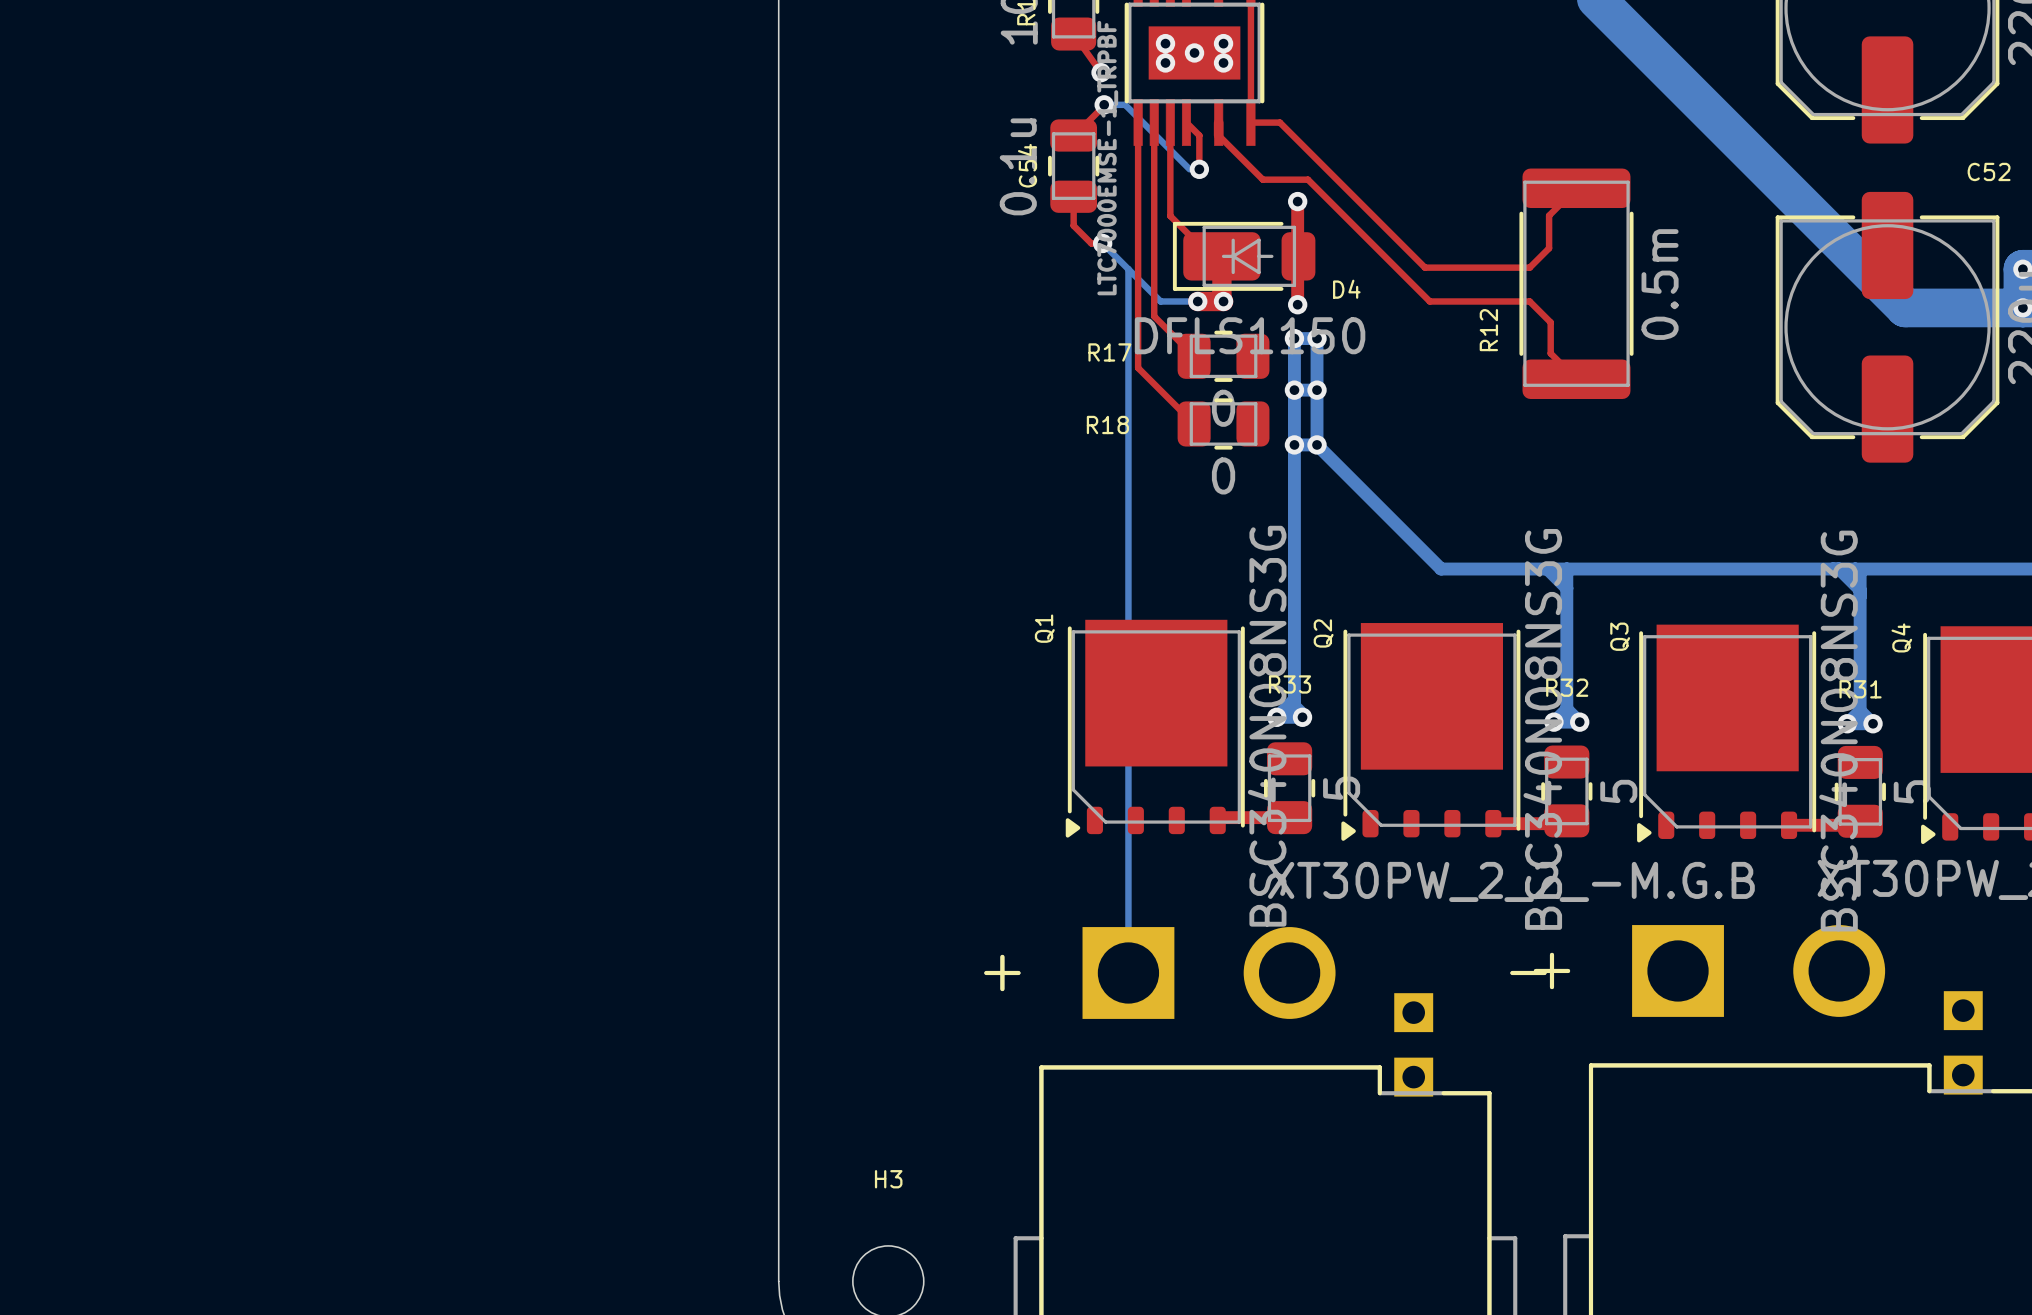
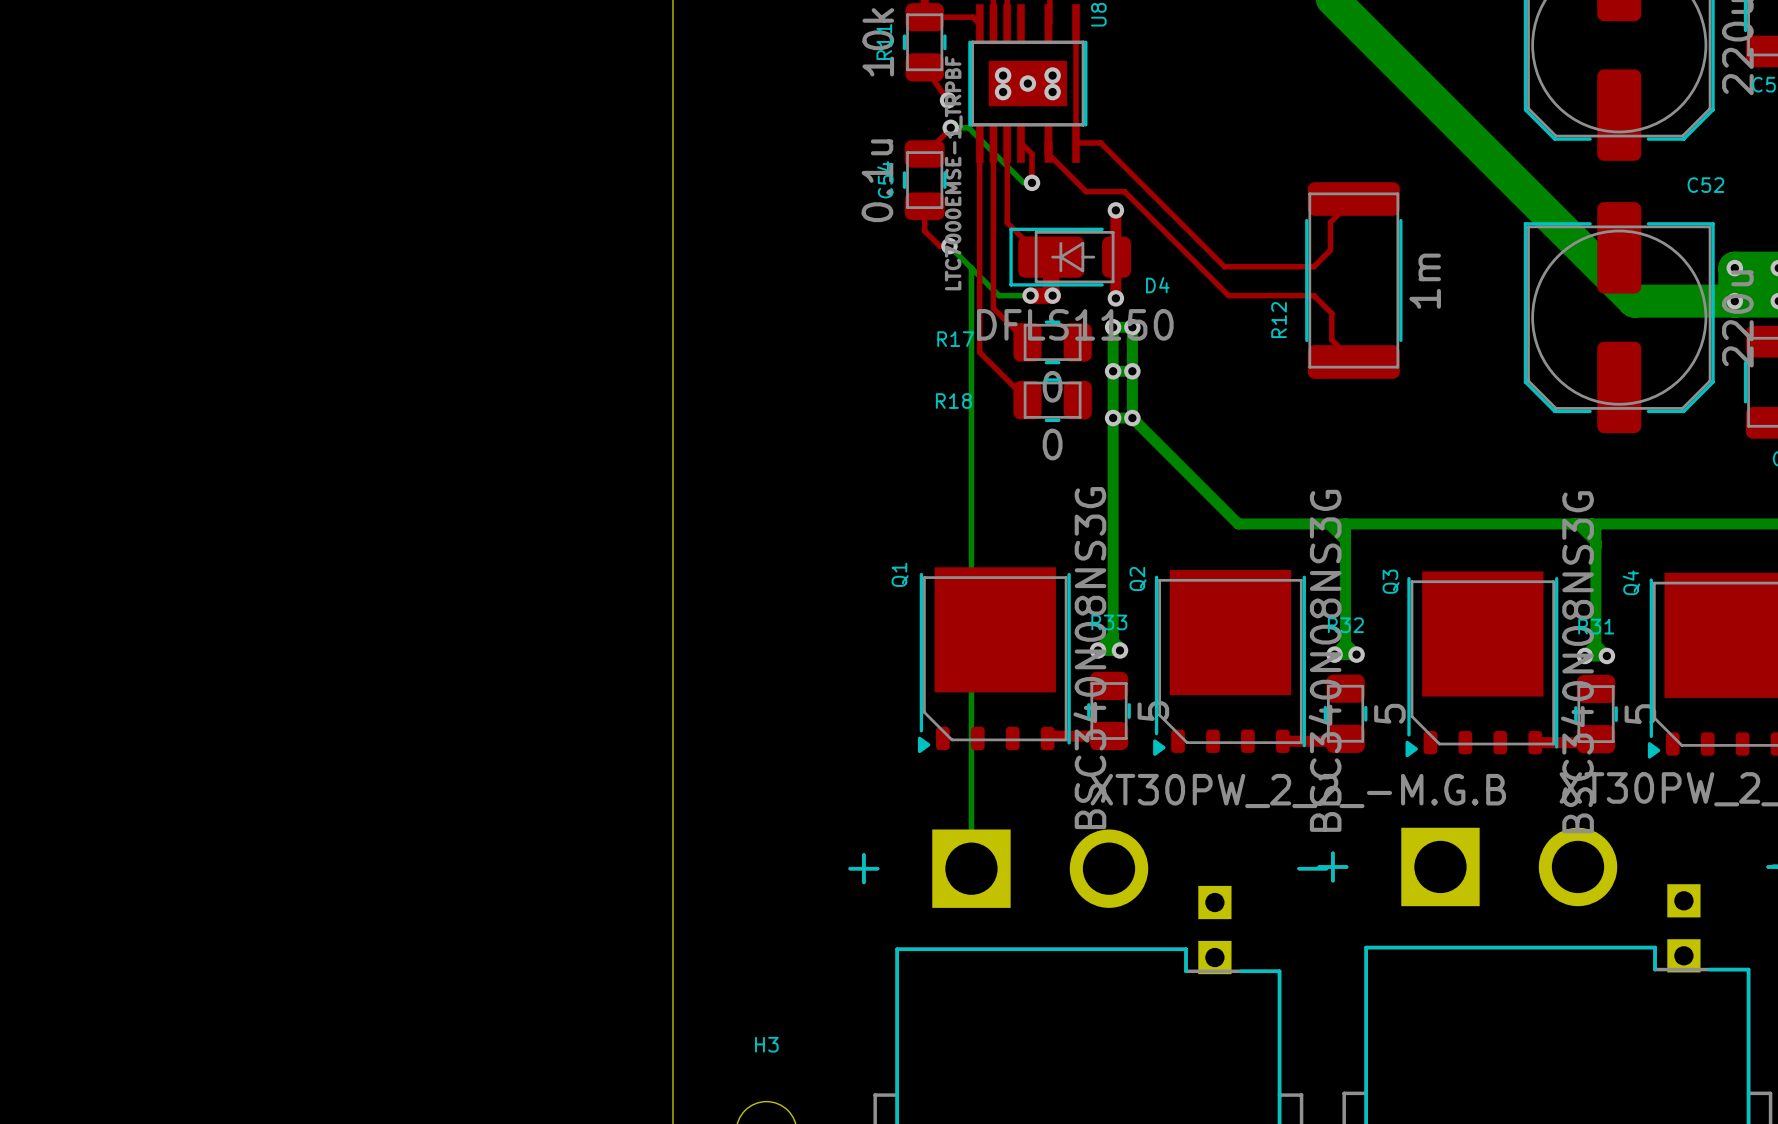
R12 value: 0.5m (1660, 284) -> 1m (1425, 281)

